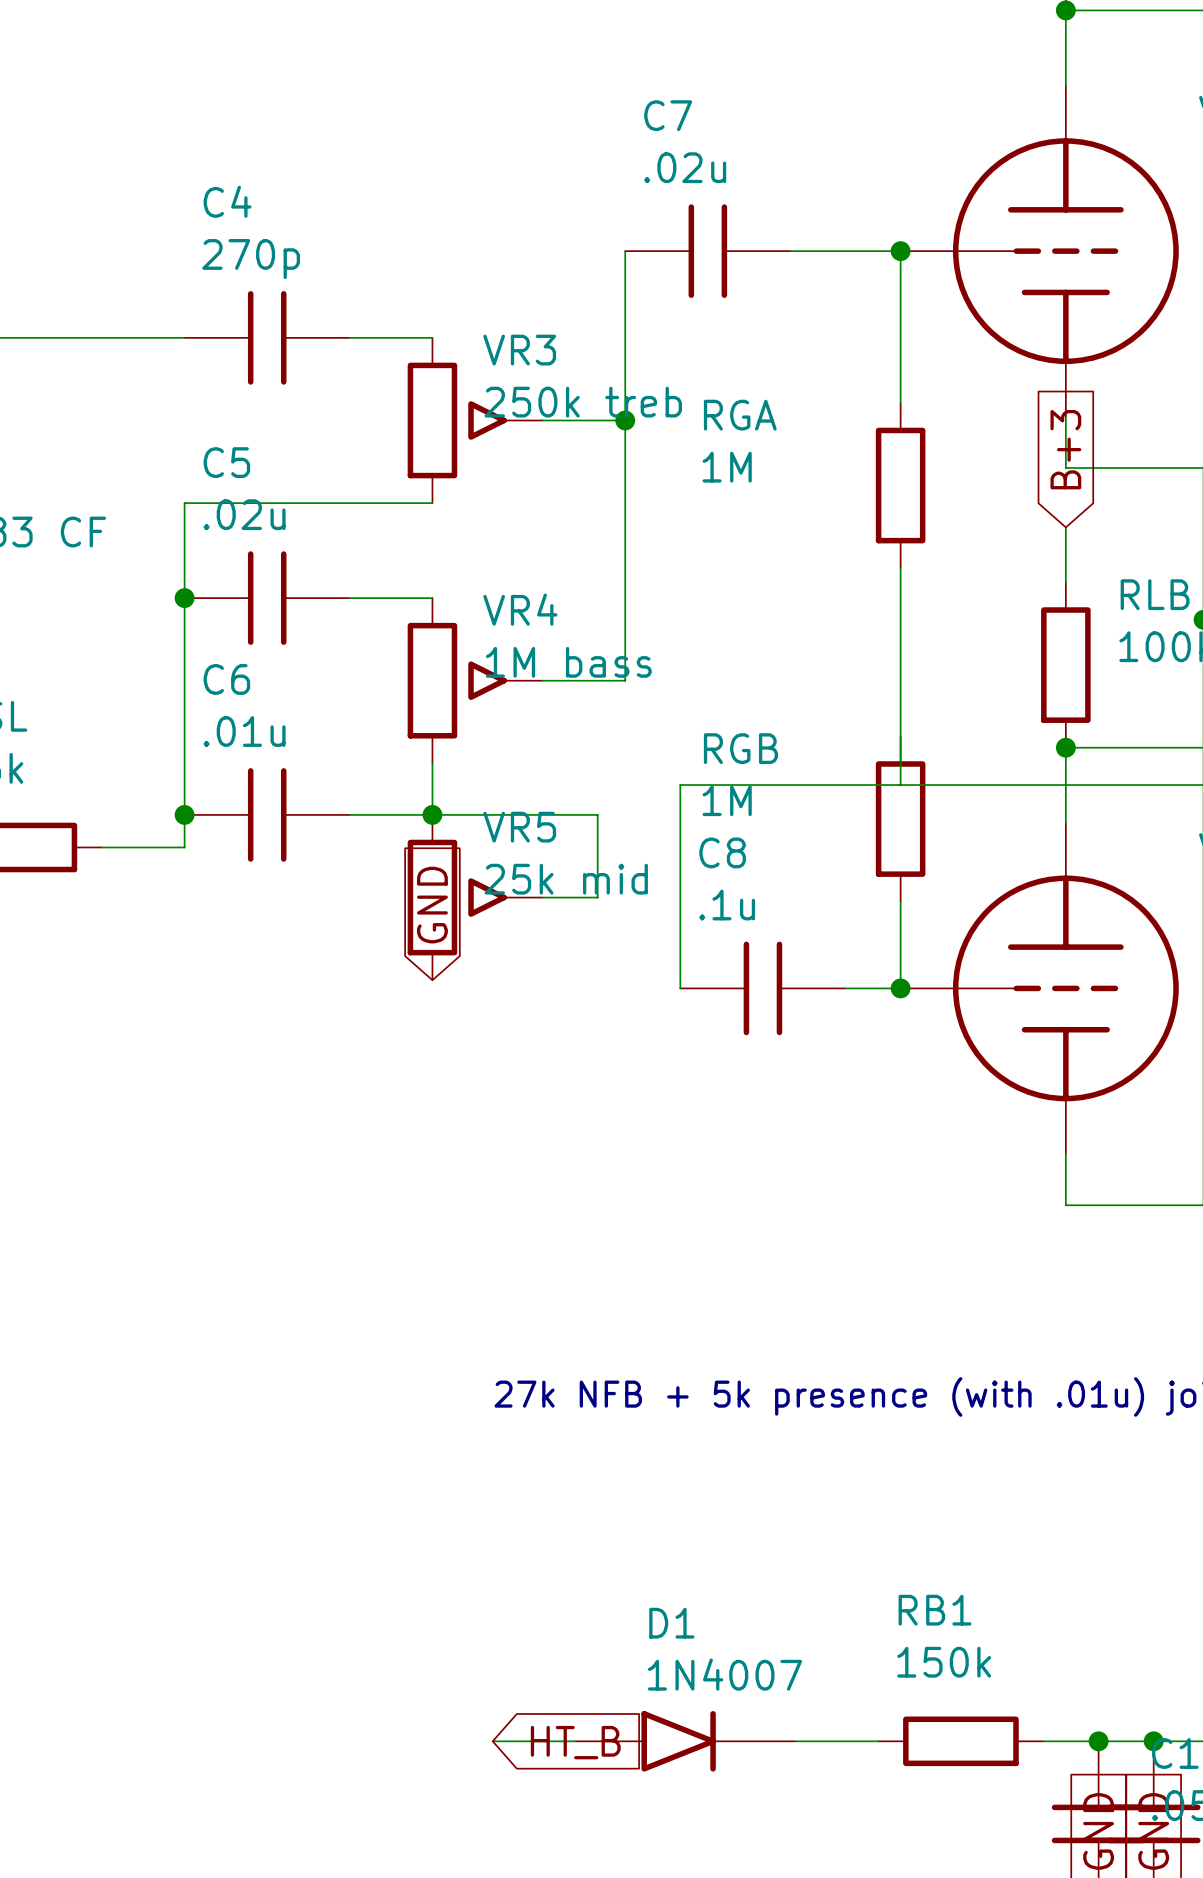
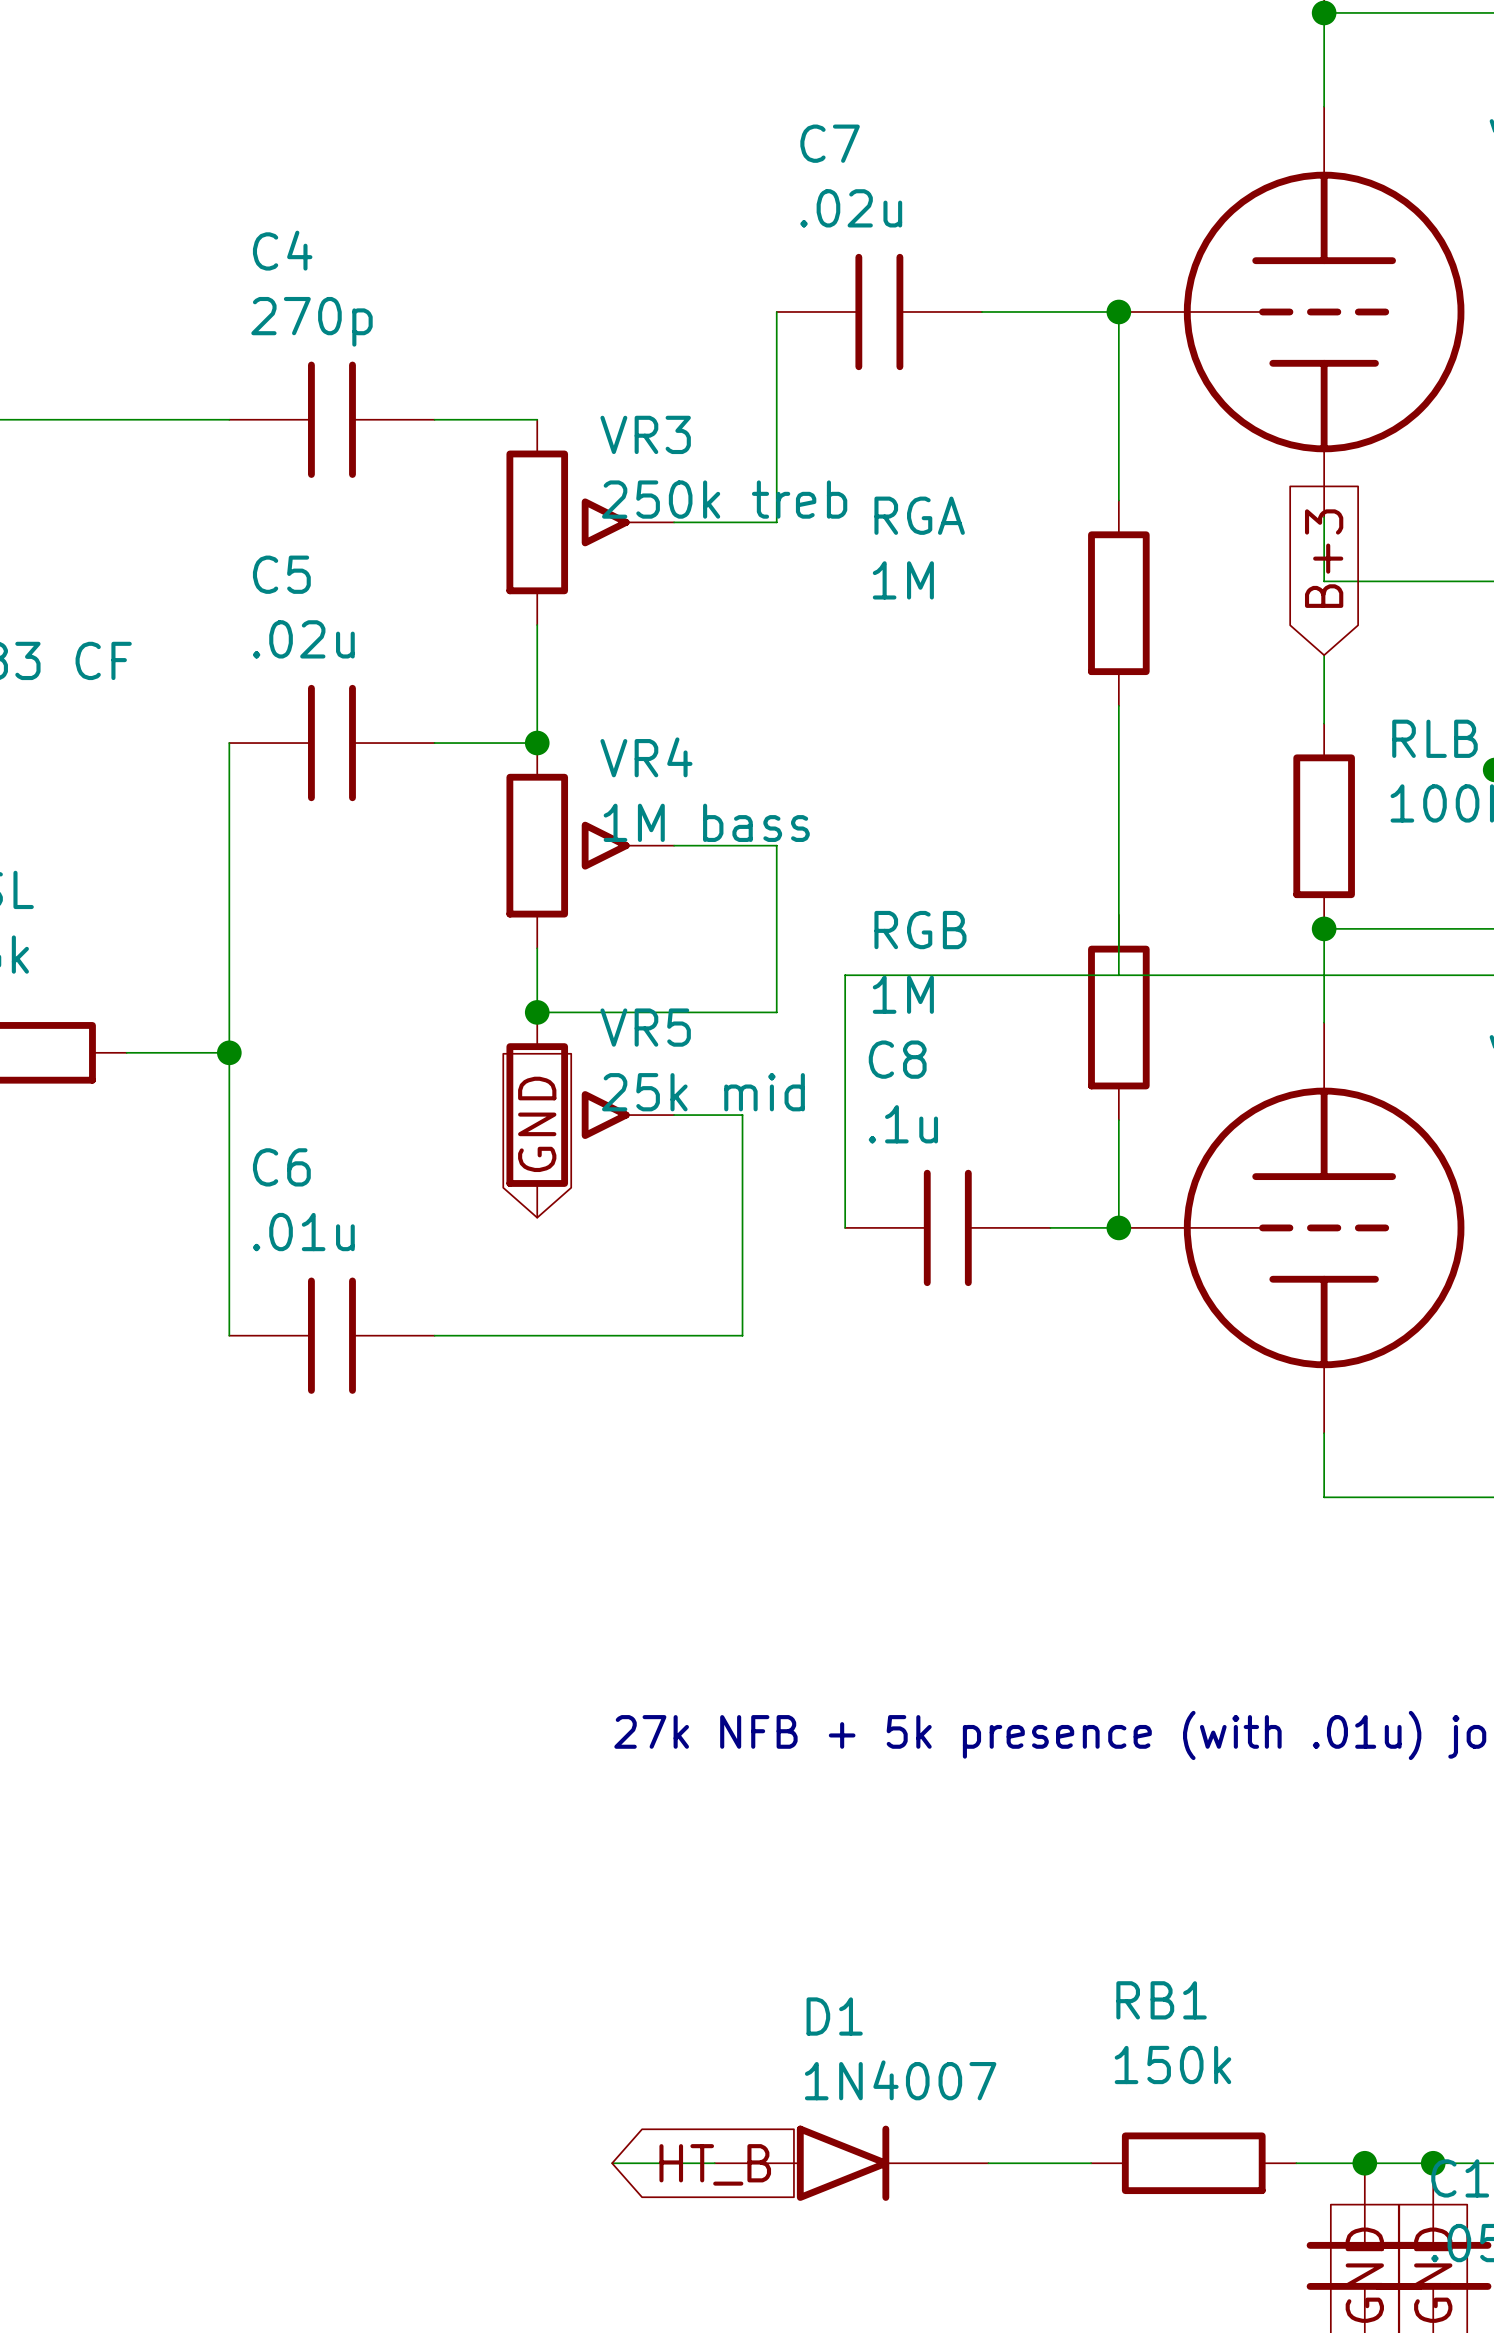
wire: (625, 420) (625, 680) -> none
junction: (625, 420) -> none
wire: (432, 503) (184, 503) (184, 598) -> (537, 625) (537, 743)
junction: (184, 598) -> none
junction: none -> (537, 743)
junction position: (184, 814) -> (229, 1052)
C6 position: (267, 814) -> (331, 1335)
wire: (349, 814) (432, 814) -> none
wire: (597, 814) (597, 897) -> (742, 1012) (776, 1012) (776, 845)
wire: none -> (229, 1052) (229, 1335)
wire: none -> (742, 1115) (742, 1335) (434, 1335)

